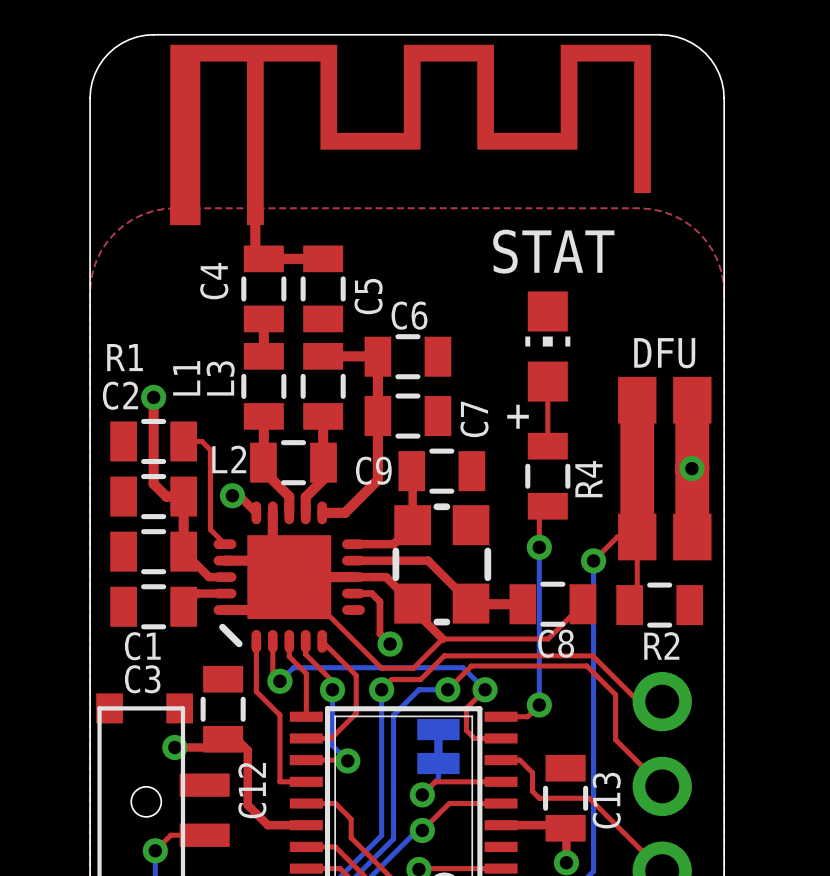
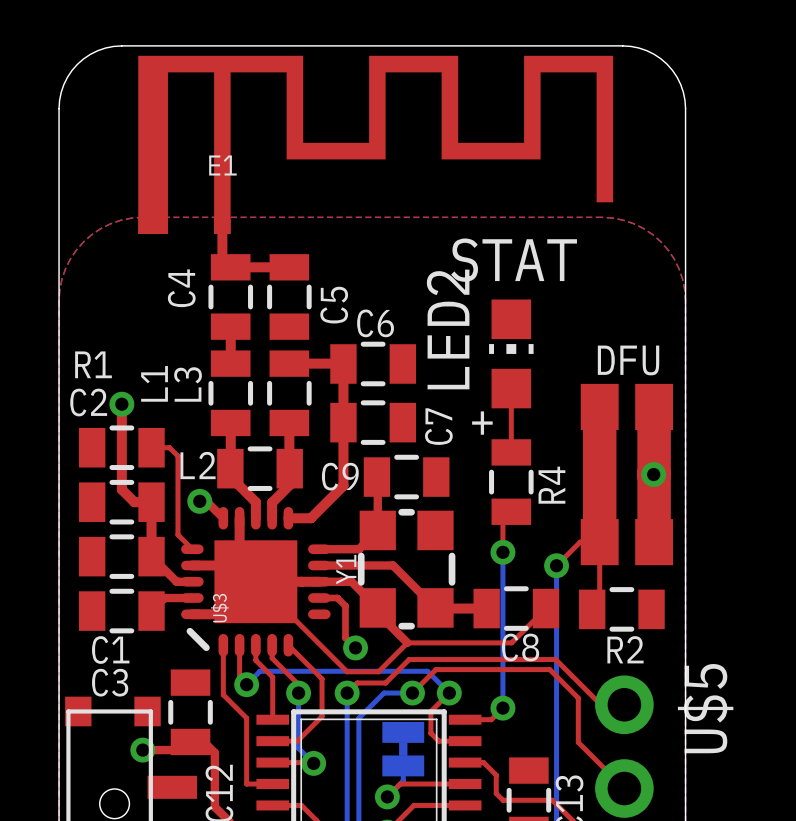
E1 name: none -> E1 (222, 165)
LED2 name: none -> LED2 (448, 329)
Y1 name: none -> Y1 (346, 569)
U$3 name: none -> U$3 (219, 608)
U$5 name: none -> U$5 (705, 708)

